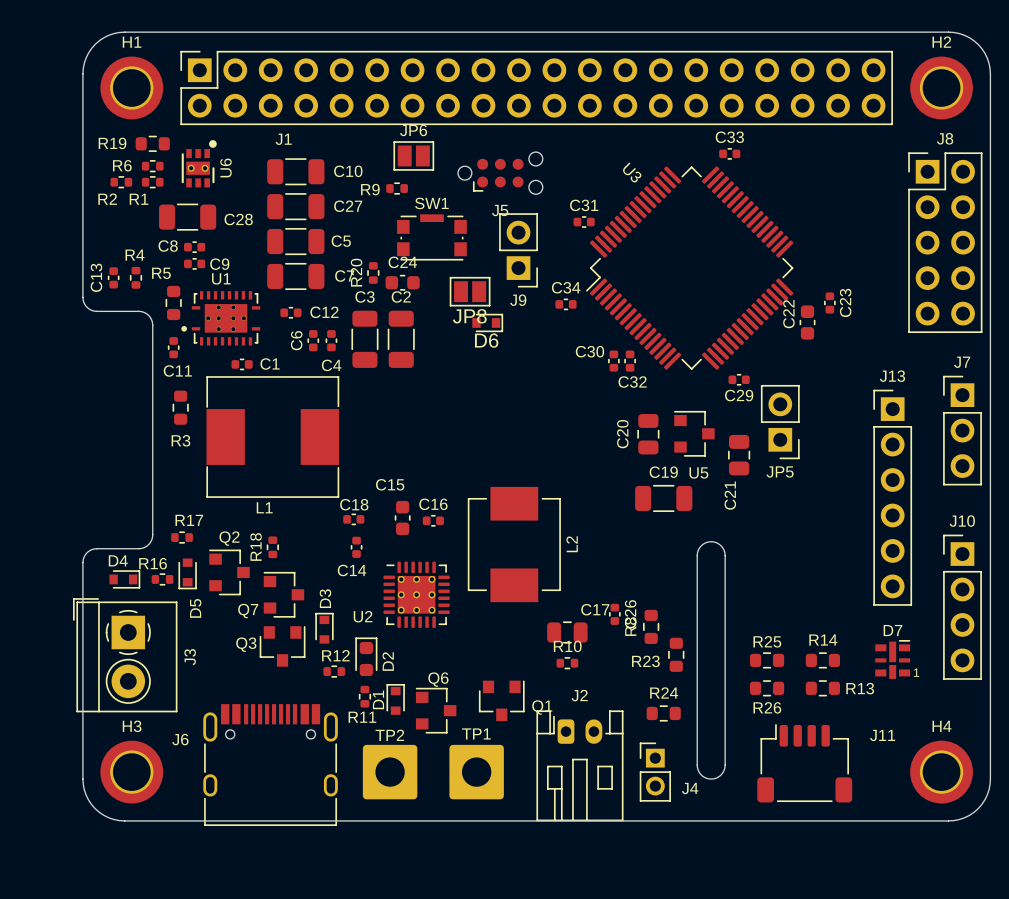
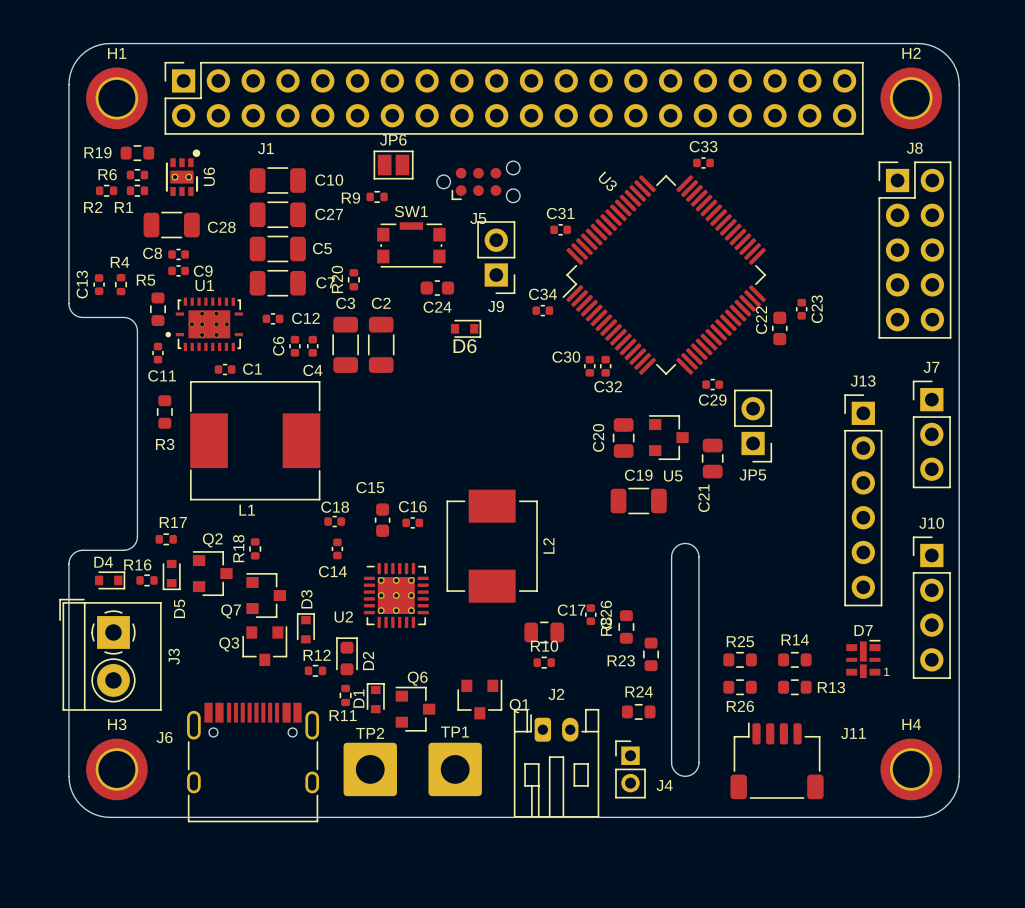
C24 name position: C24 (402, 262) -> C24 (437, 307)
C24 position: (402, 282) -> (437, 288)
JP8: (470, 291) -> none

